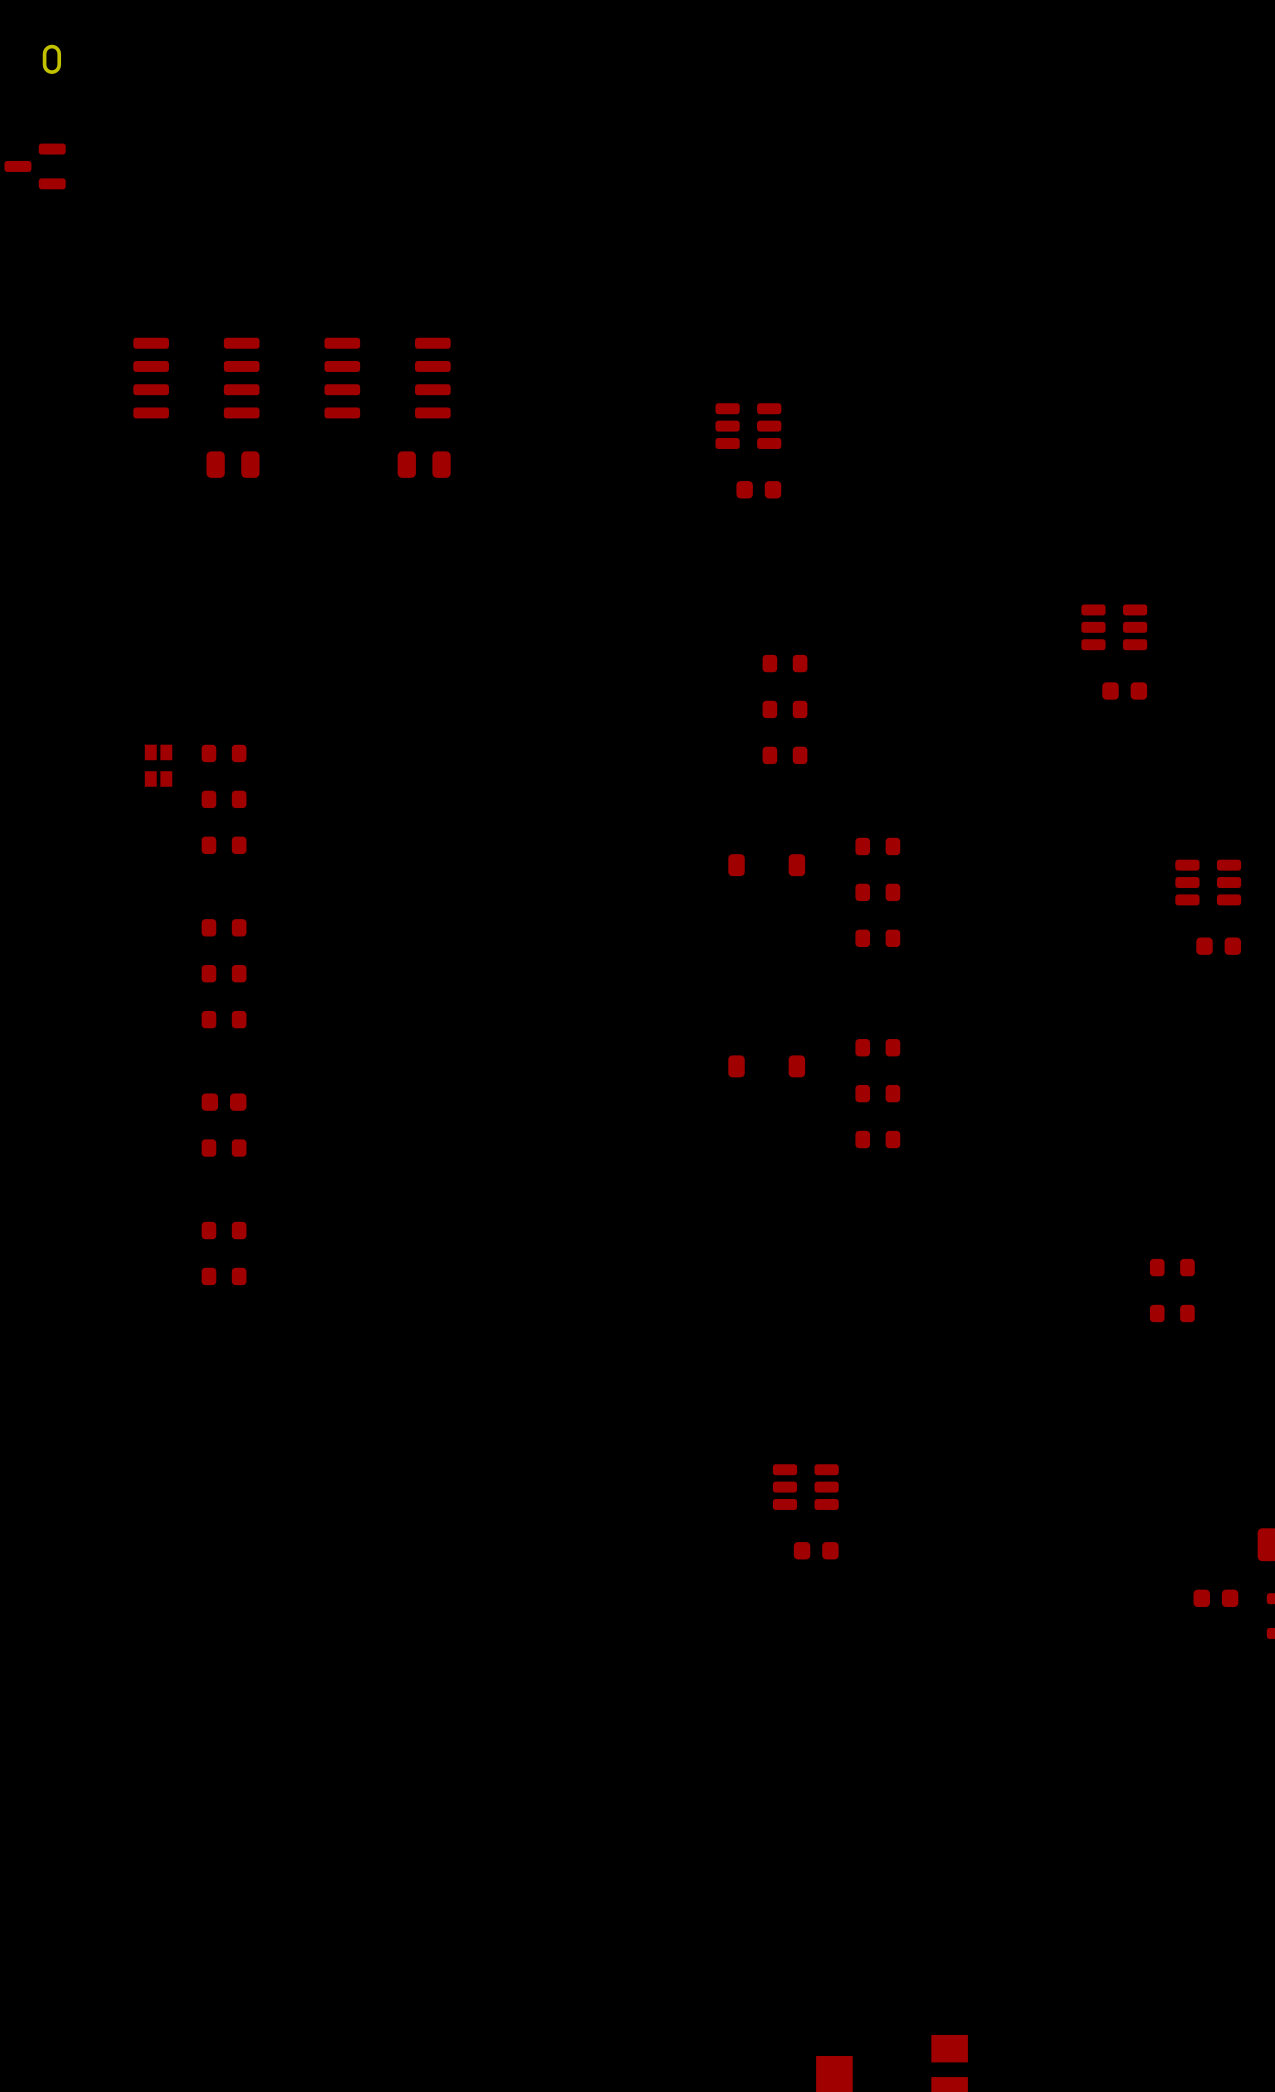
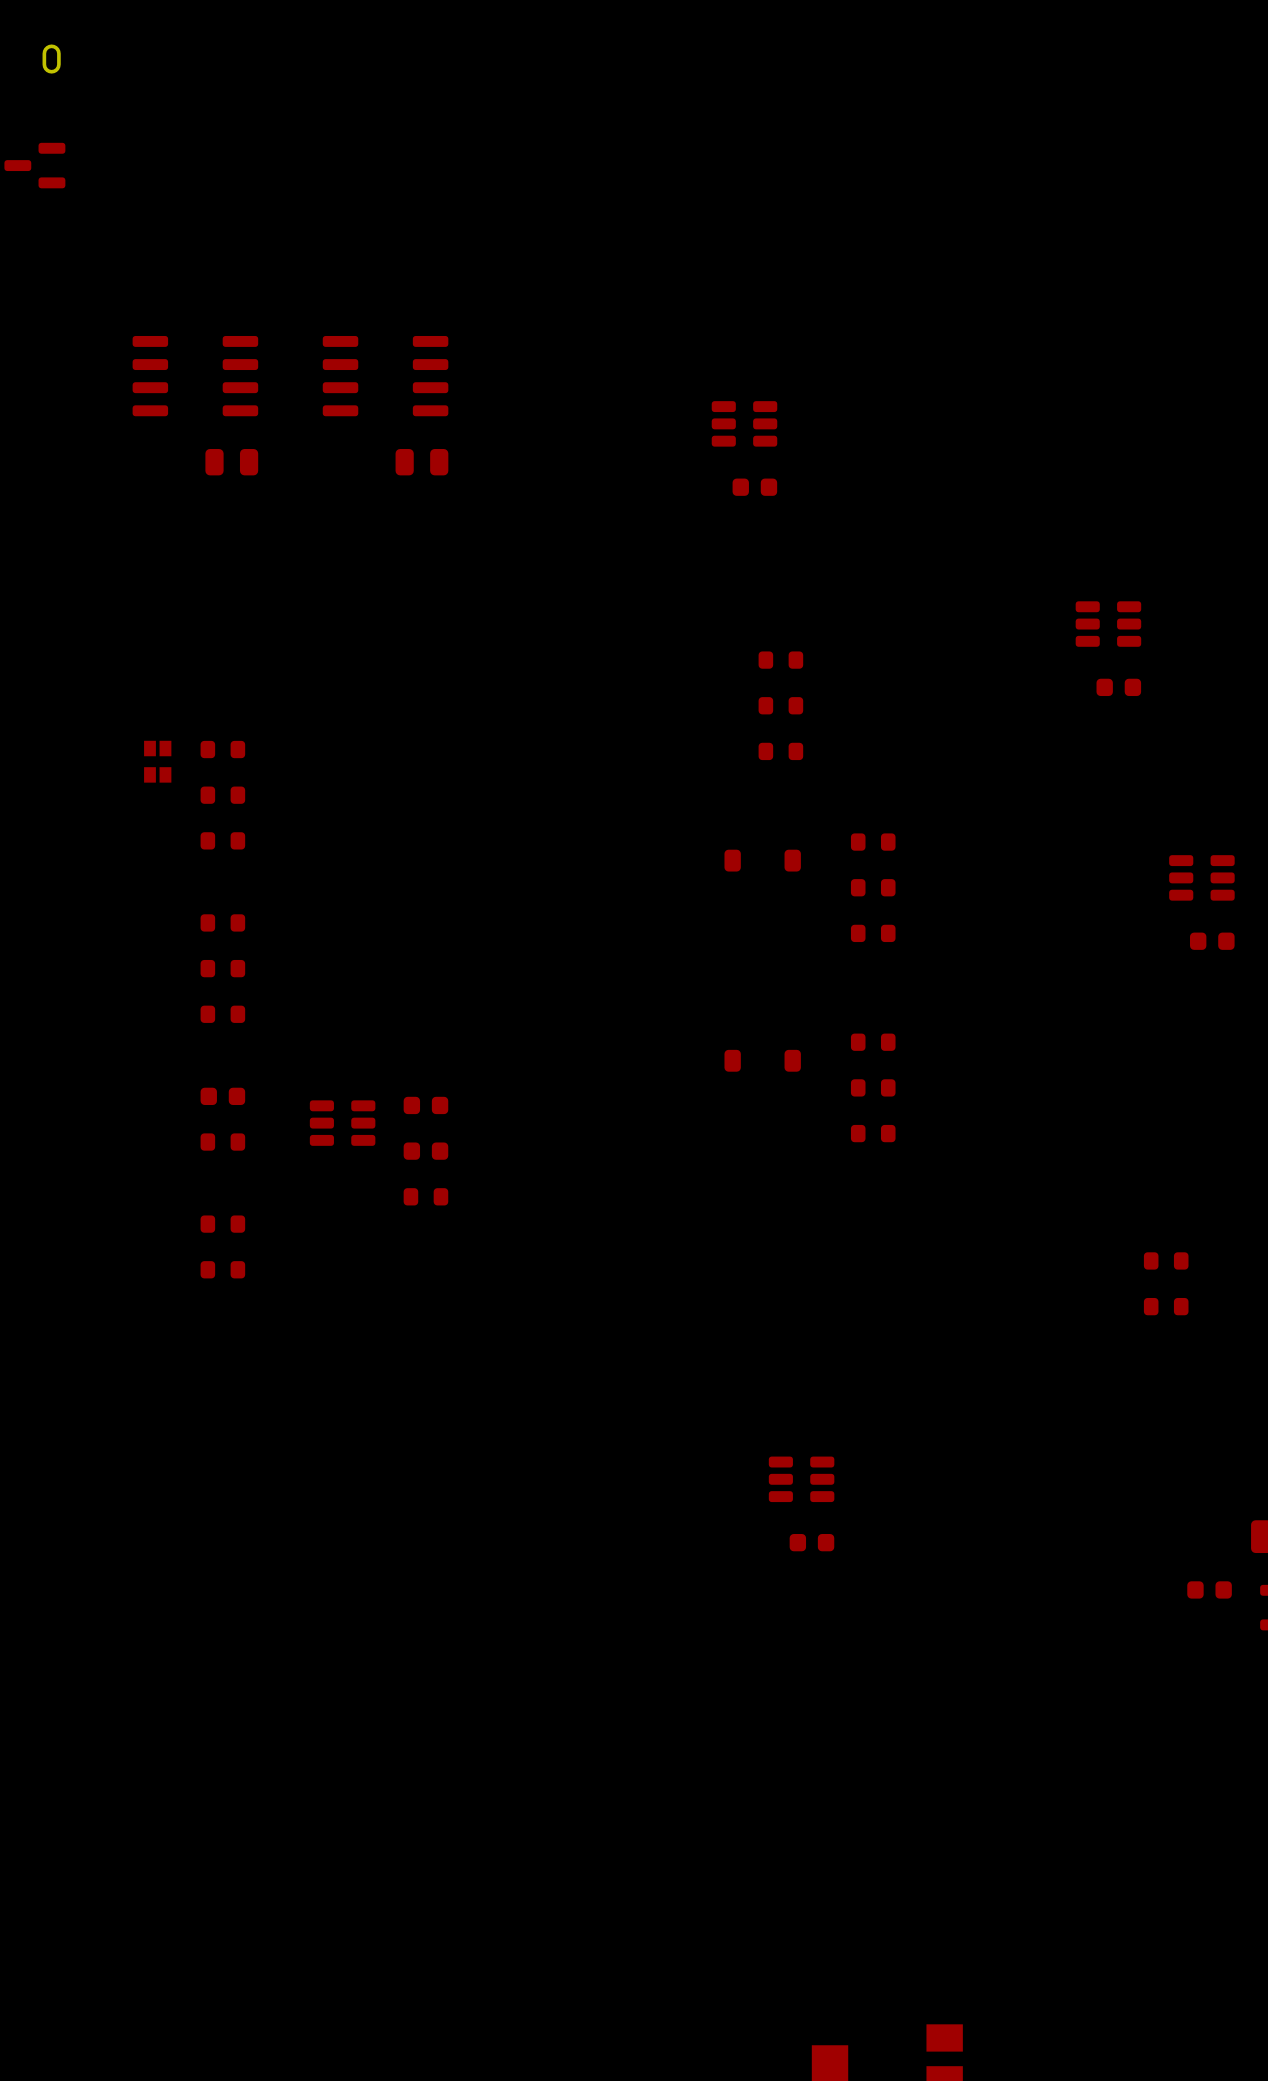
part: none -> (425, 1105)
part: none -> (342, 1123)
part: none -> (425, 1151)
part: none -> (425, 1196)

